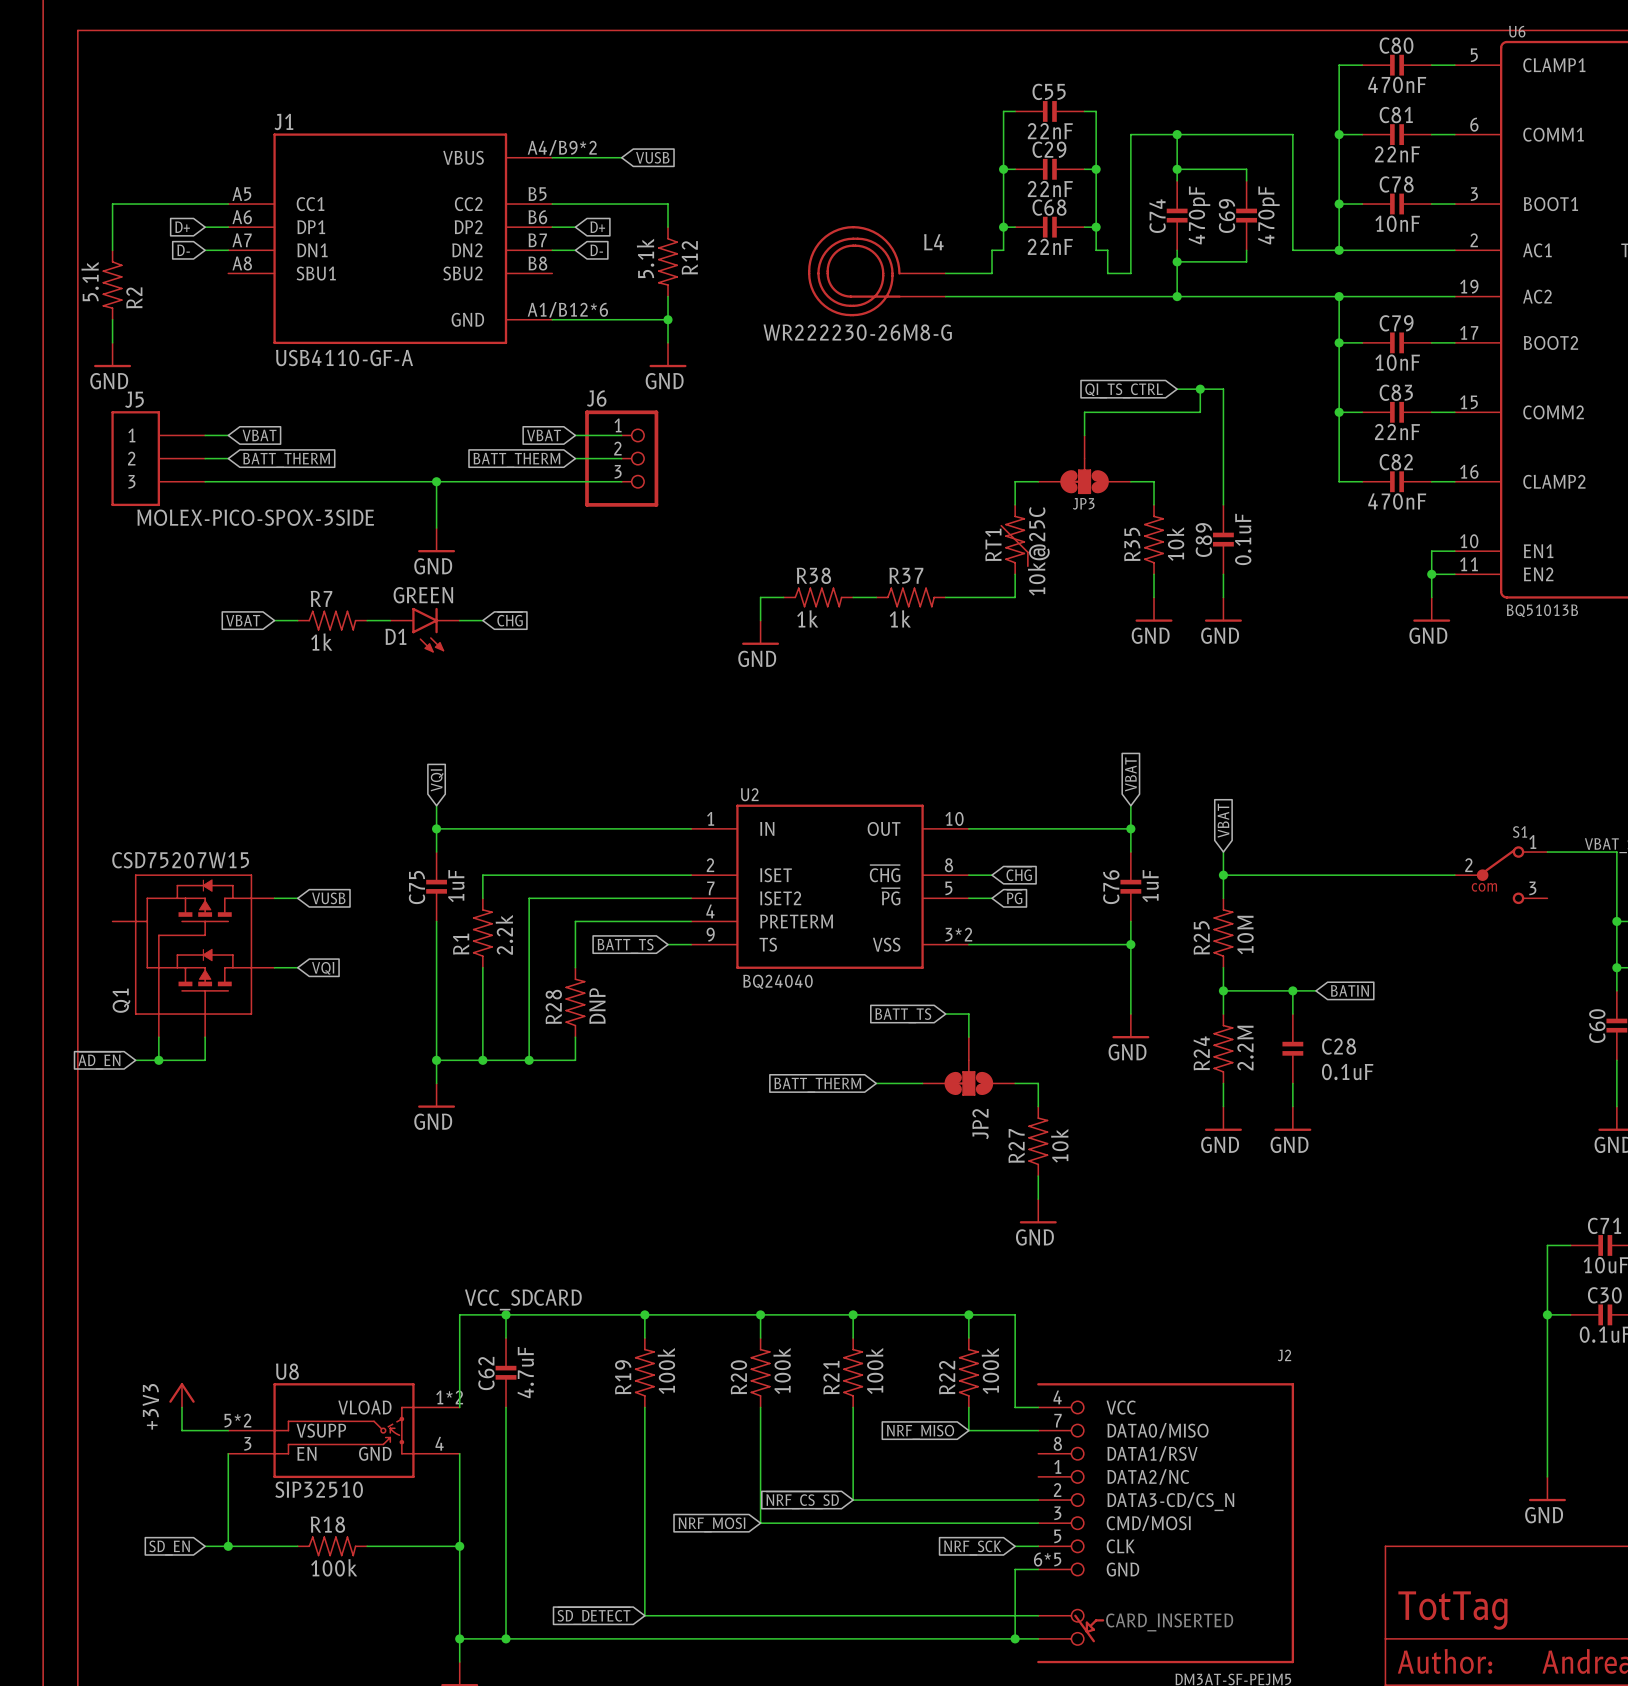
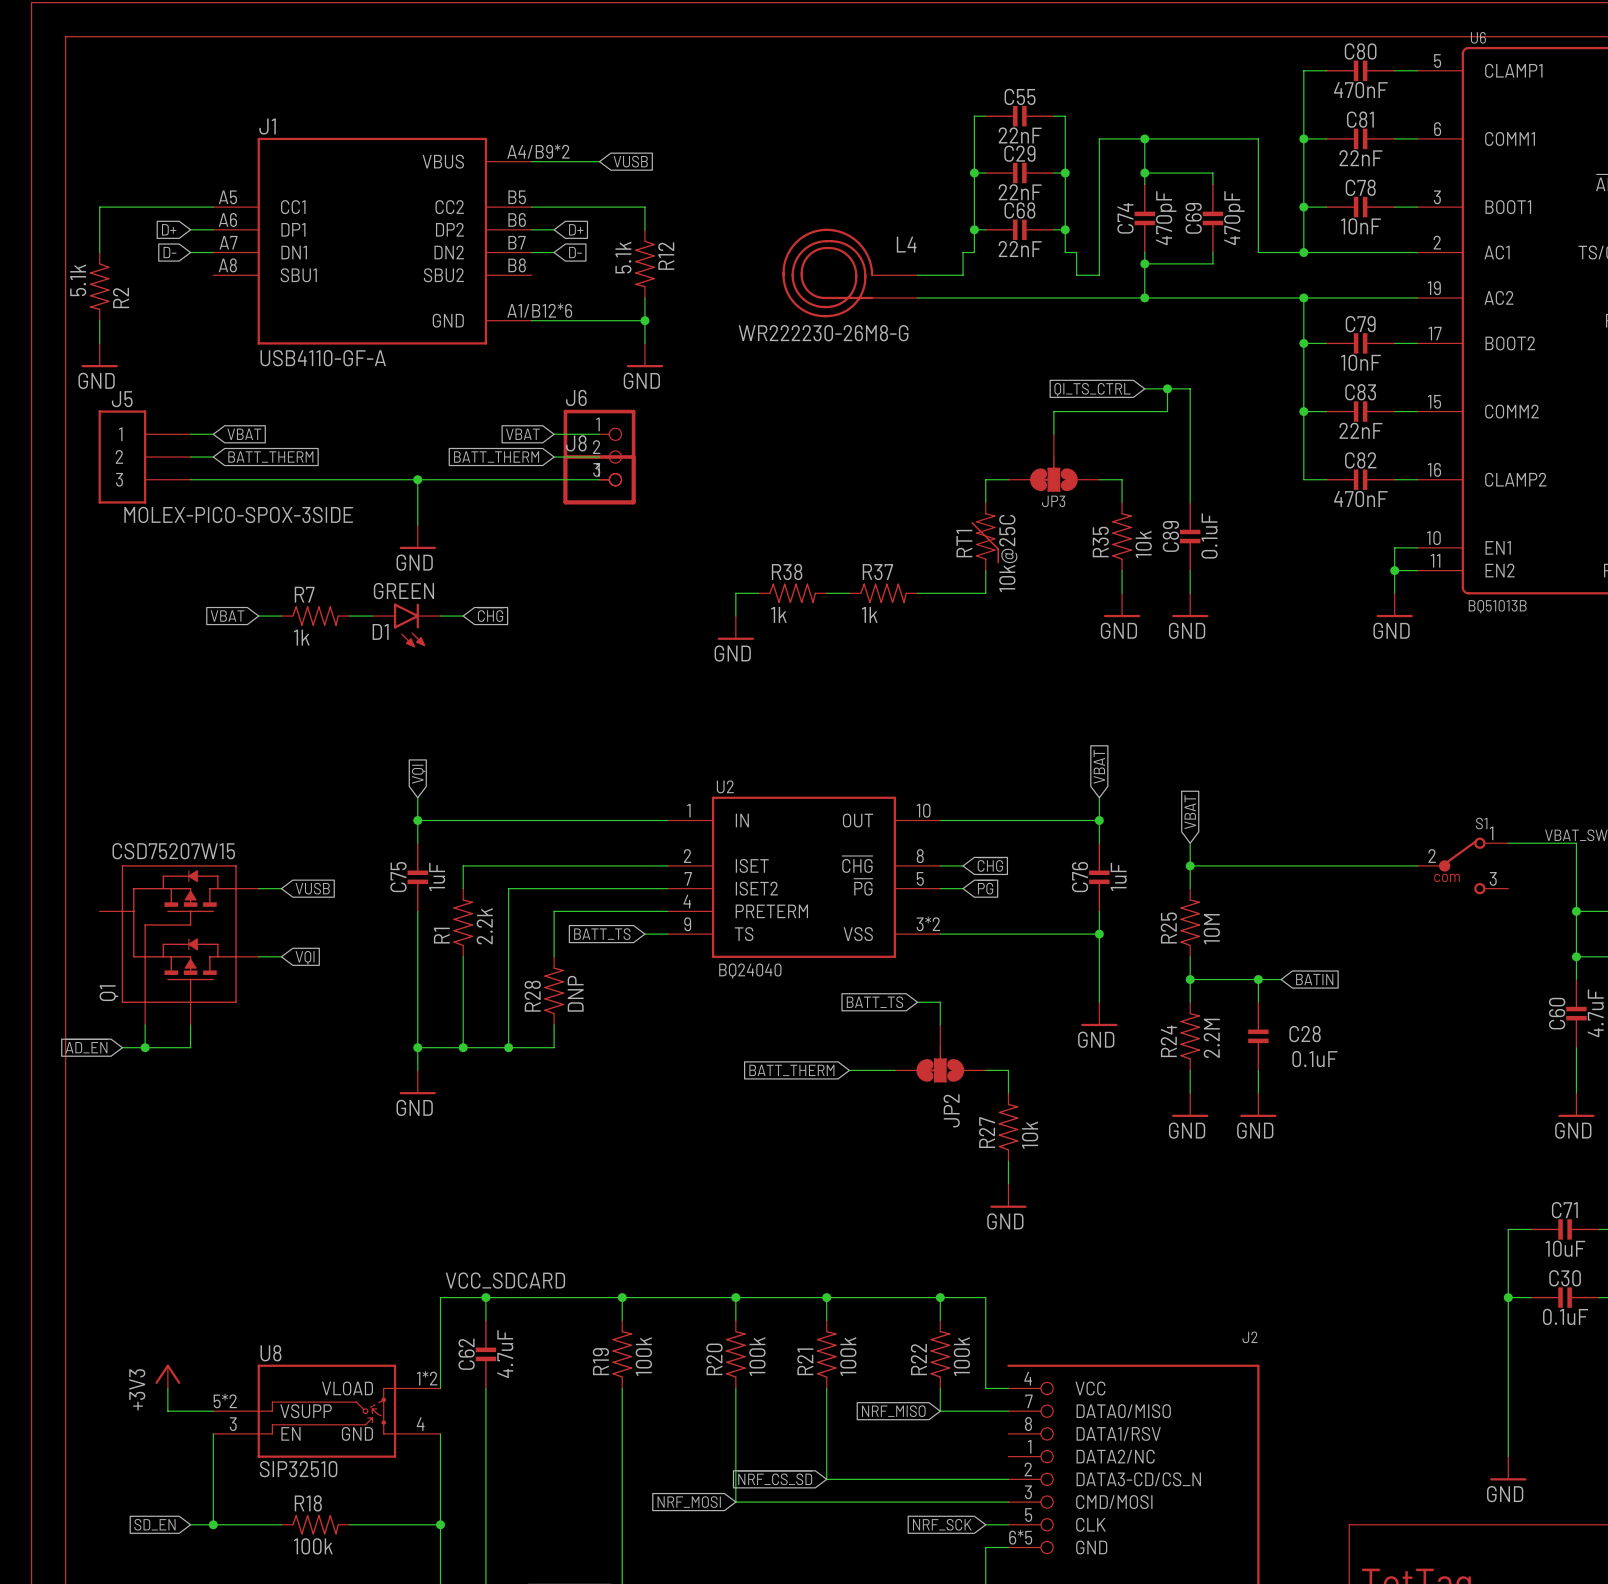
J8: none -> (599, 479)

